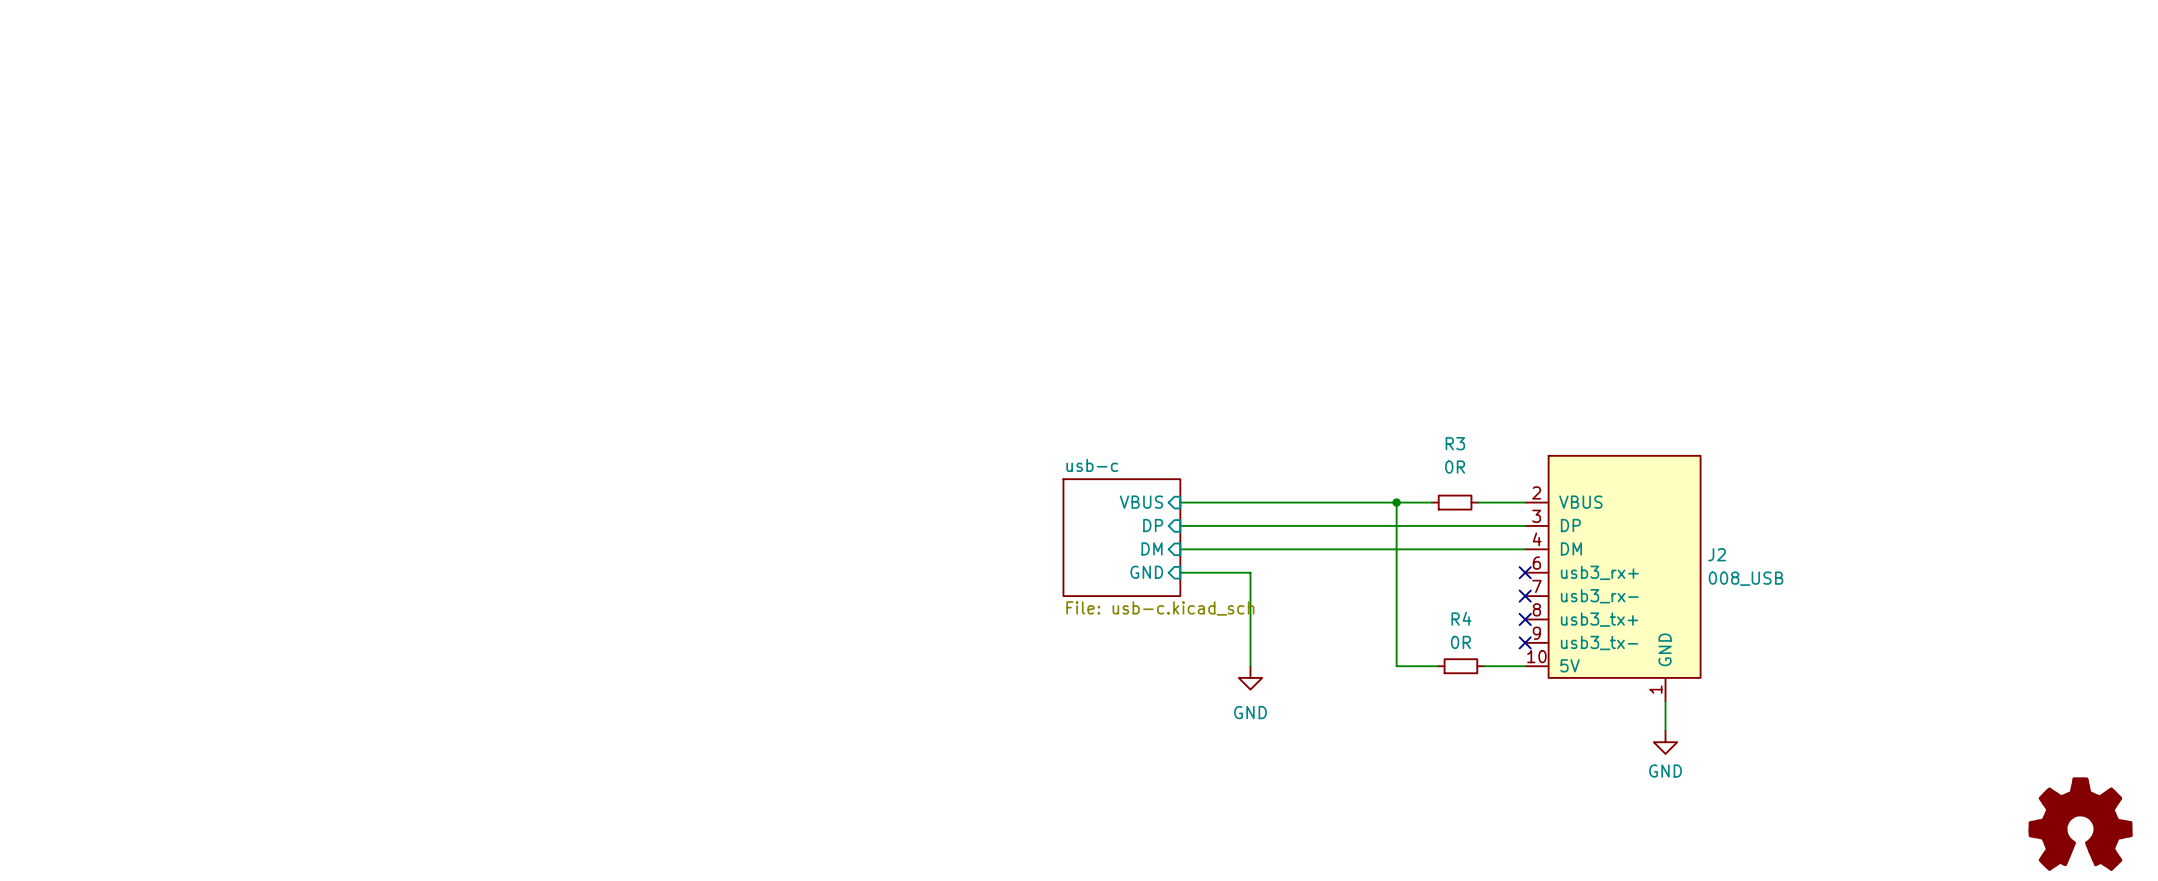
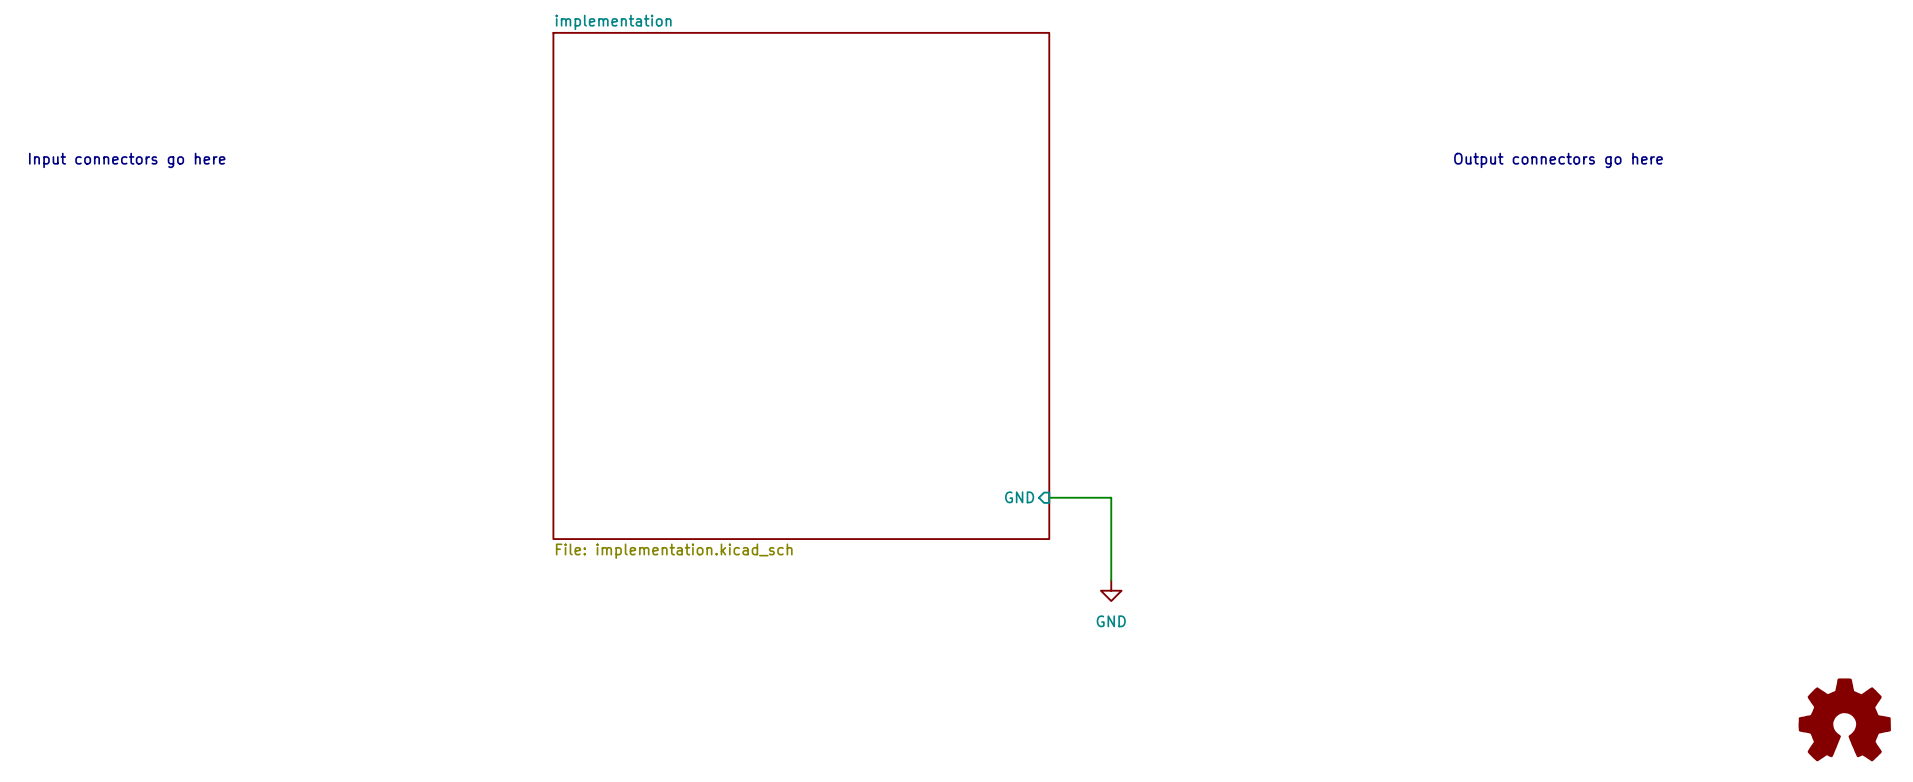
text: none -> Input connectors go here (127, 160)
text: none -> Output connectors go here (1558, 160)
sheet implementation: none -> File: implementation.kicad_sch (801, 285)
sheet pin: VBUS (1141, 502) -> none
wire: (1180, 502) (1431, 502) -> none
wire: (1396, 502) (1396, 666) (1437, 666) -> none
junction: (1396, 502) -> none
R3: 0R (1455, 502) -> none
wire: (1478, 502) (1525, 502) -> none
sheet pin: DP (1153, 525) -> none
wire: (1180, 525) (1525, 525) -> none
sheet usb-c: File: usb-c.kicad_sch (1121, 537) -> none
sheet pin: DM (1152, 548) -> none
wire: (1180, 549) (1525, 549) -> none
no-connect mark: (1525, 572) -> none
J2: 008_USB (1612, 578) -> none
no-connect mark: (1525, 596) -> none
no-connect mark: (1525, 619) -> none
no-connect mark: (1525, 642) -> none
R4: 0R (1460, 666) -> none
wire: (1484, 666) (1525, 666) -> none
wire: (1665, 701) (1665, 730) -> none
power symbol: GND (1665, 742) -> none

